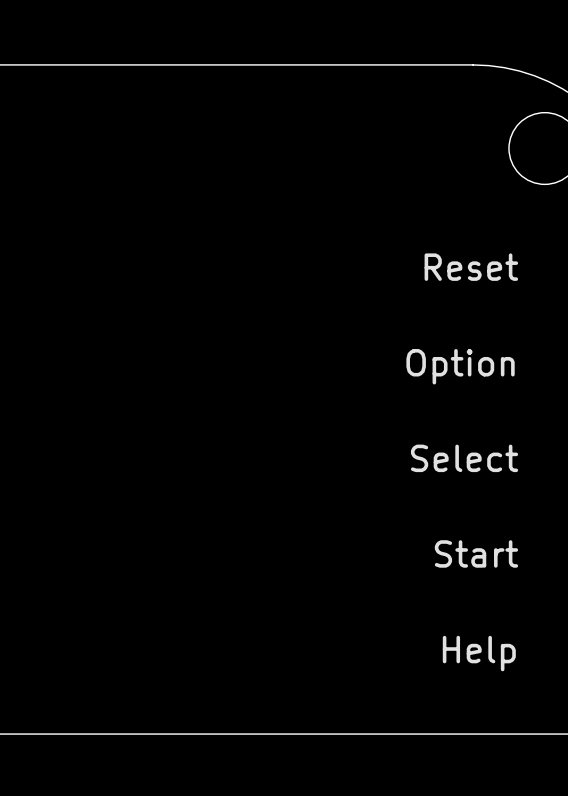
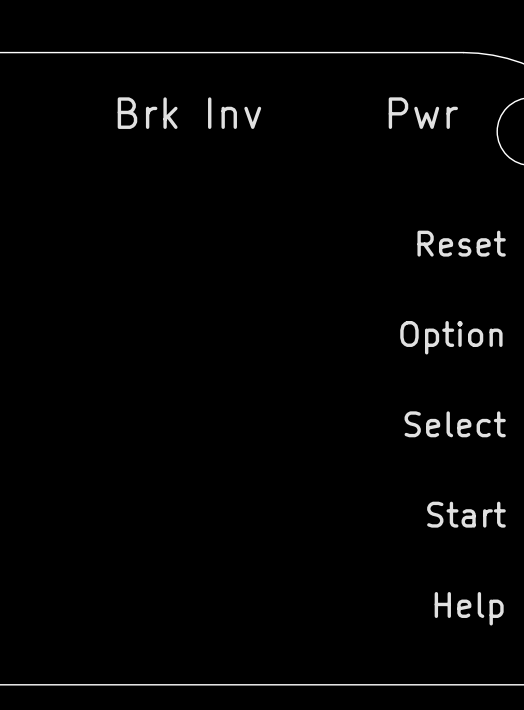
text: none -> Brk (147, 113)
text: none -> Inv (234, 113)
text: none -> Pwr (423, 113)

